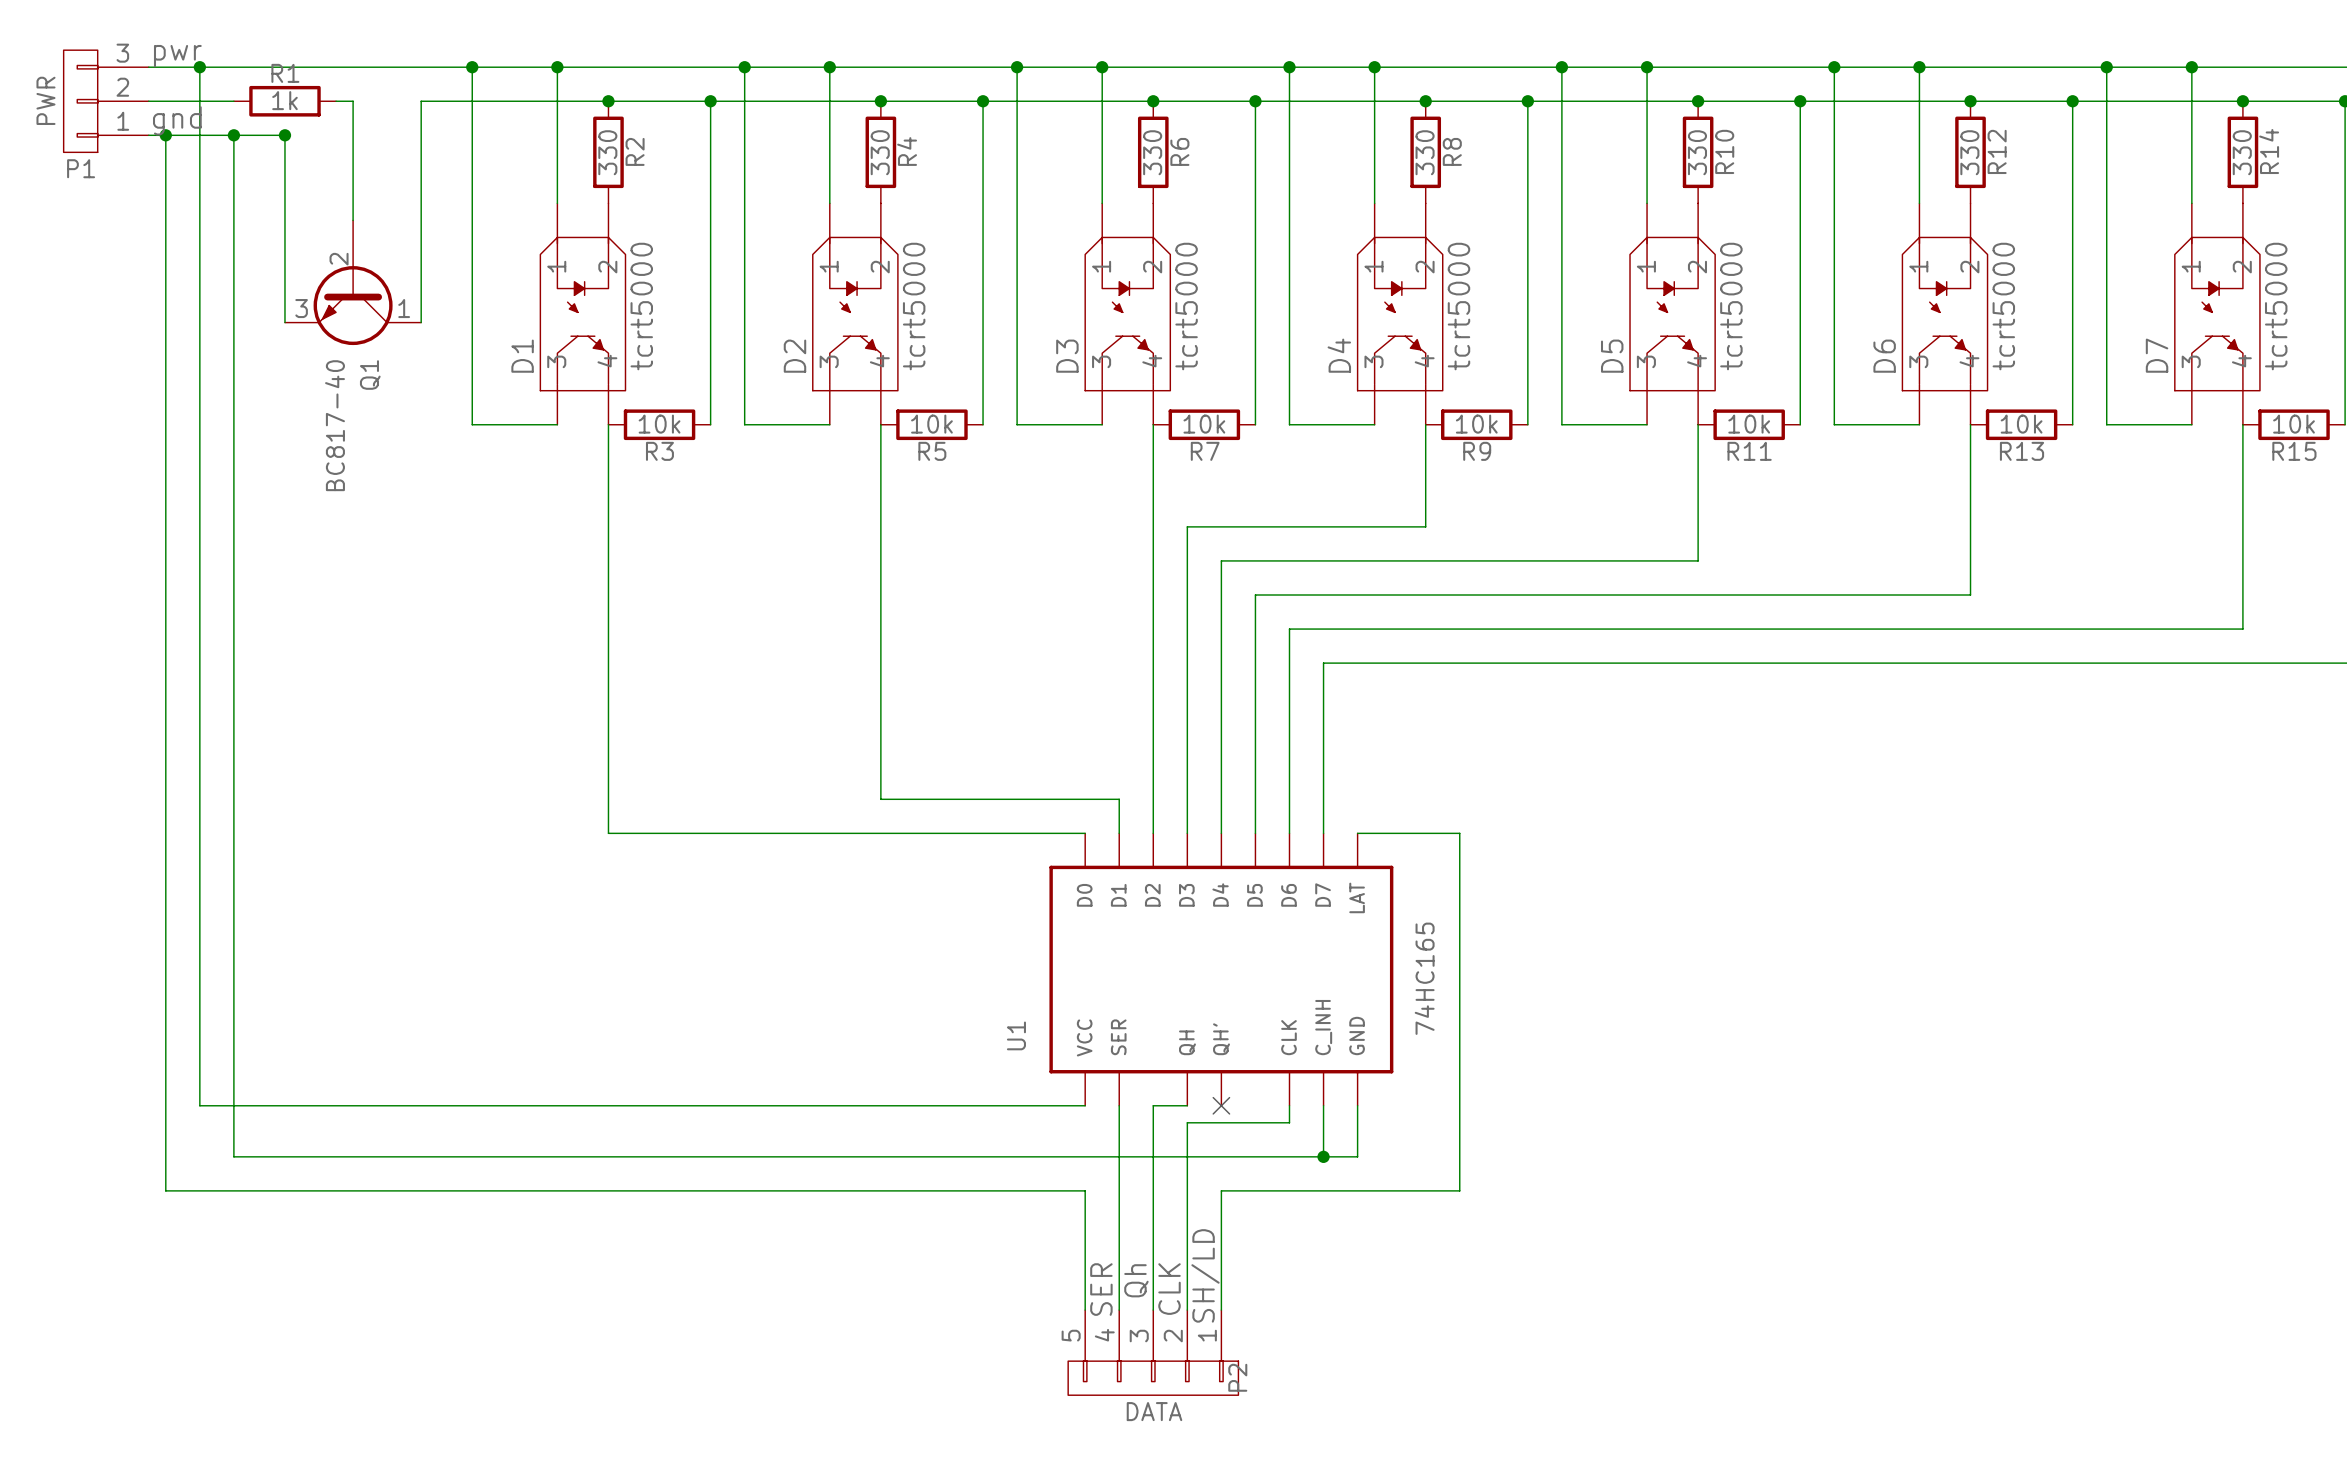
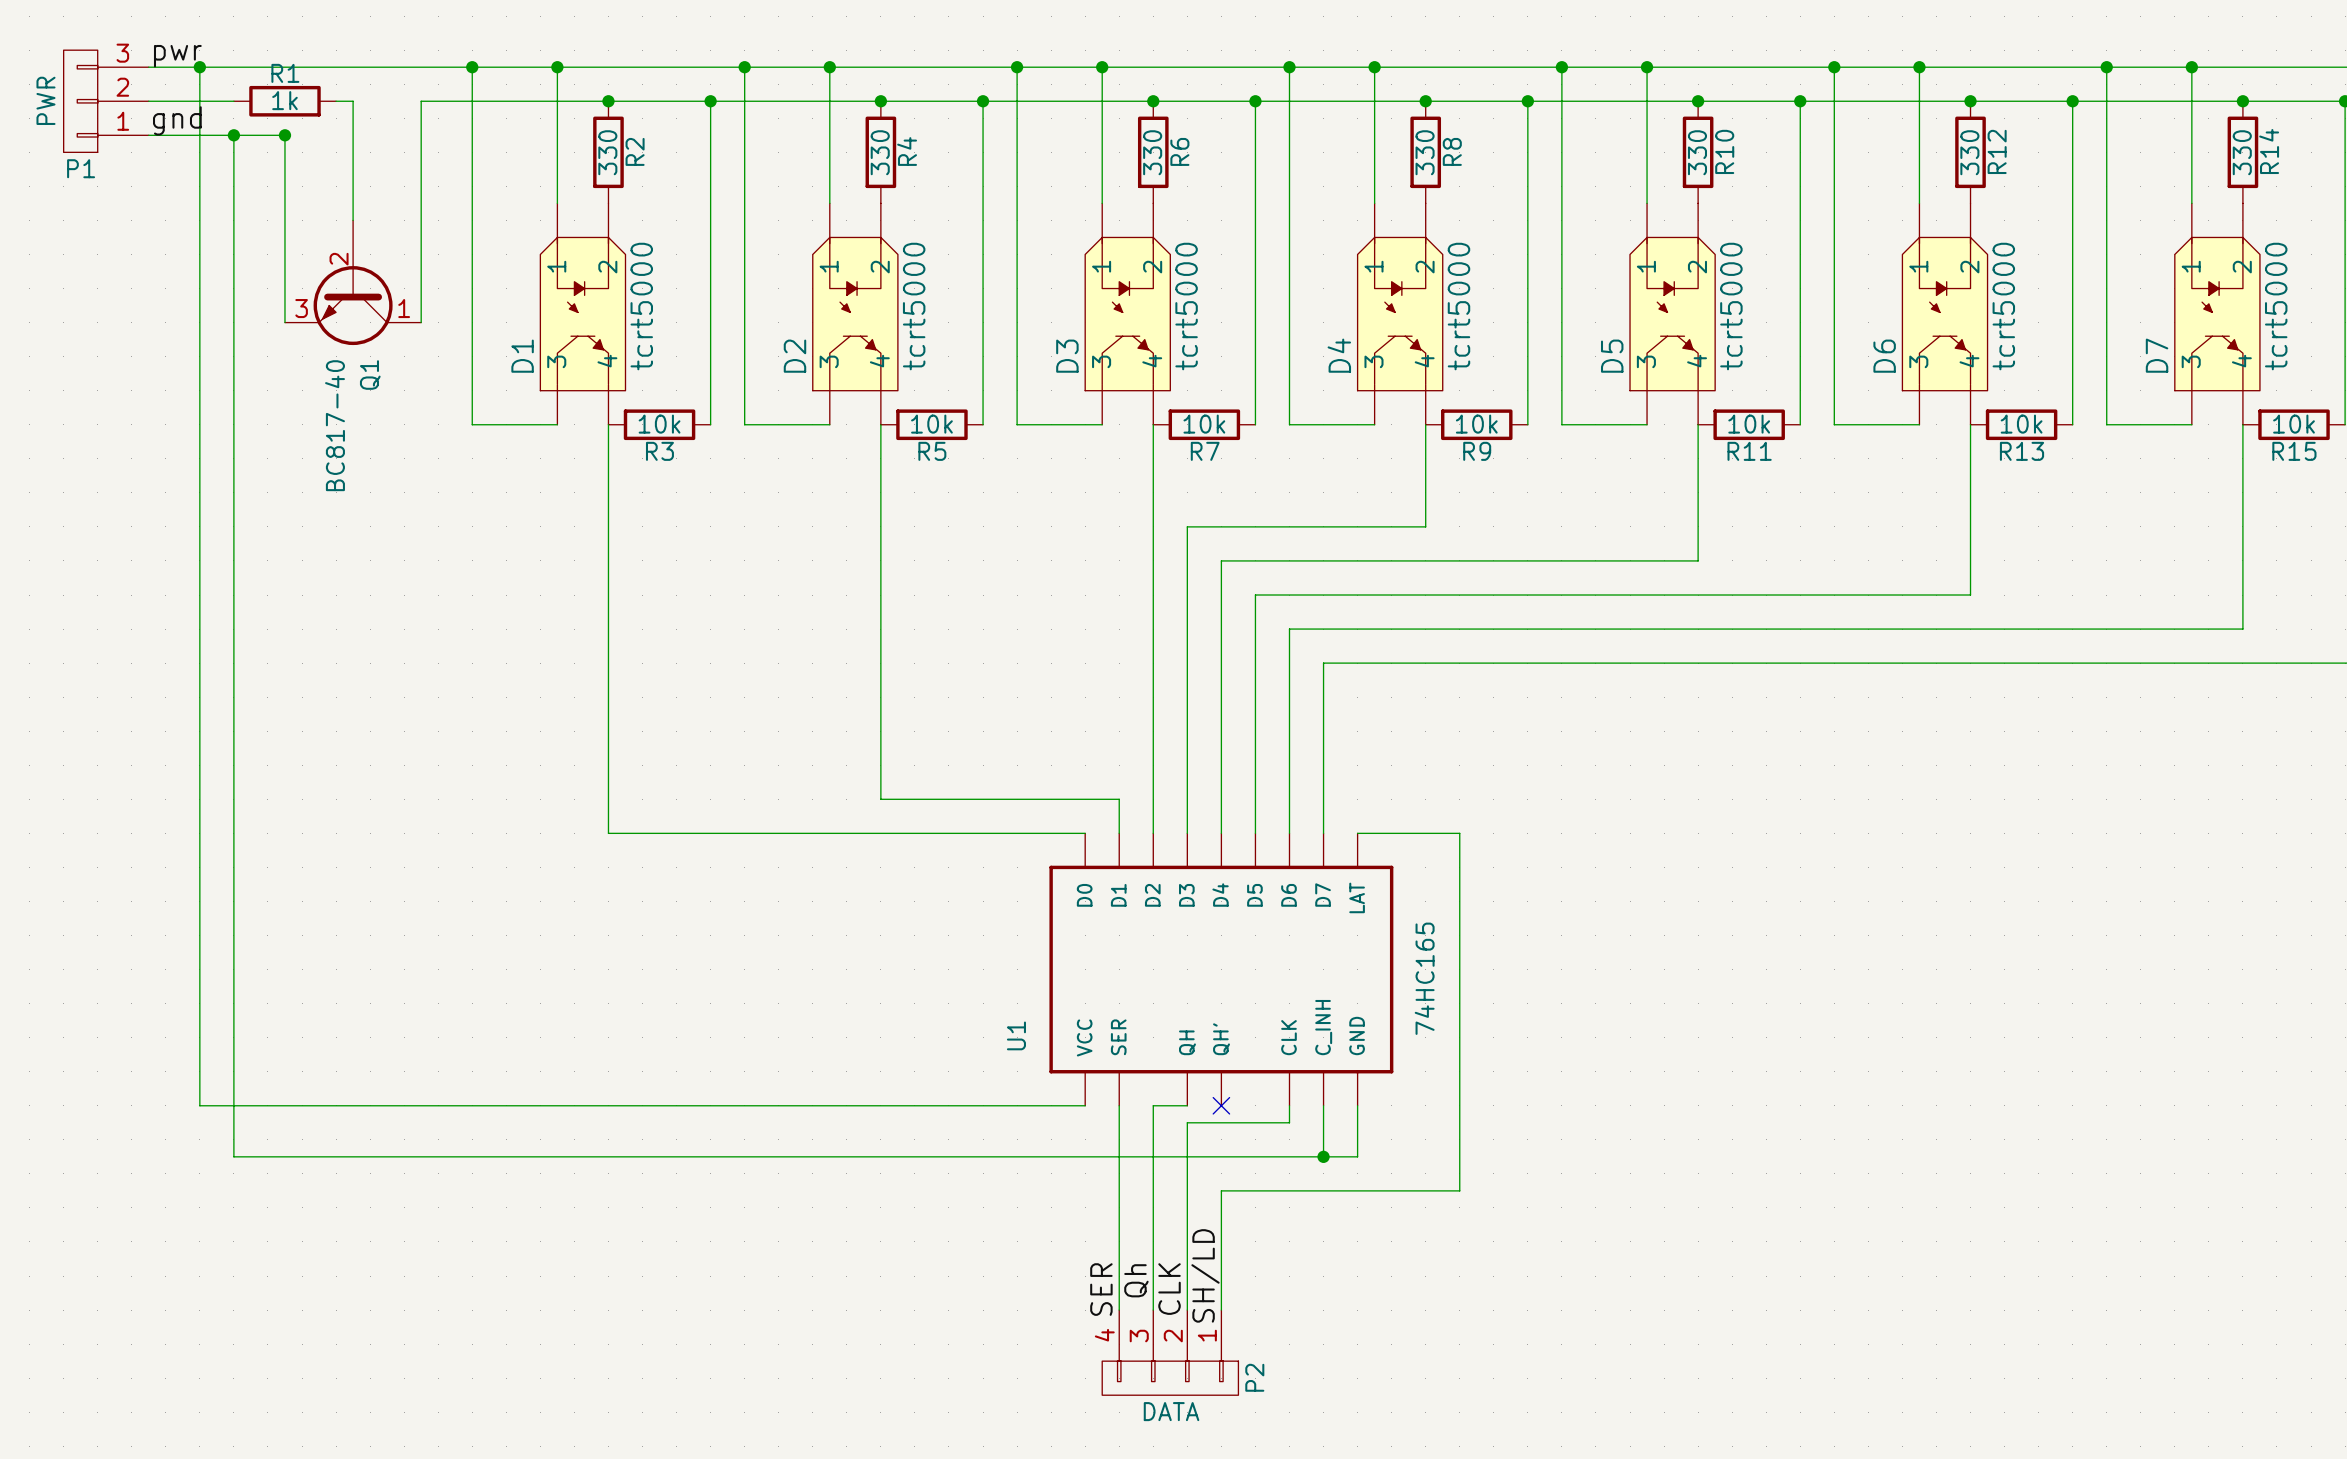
wire: (165, 135) (165, 1190) (1085, 1190) (1085, 1310) -> none
junction: (165, 135) -> none
P2 symbol: [1068, 1310, 1239, 1396] -> [1102, 1310, 1239, 1396]

